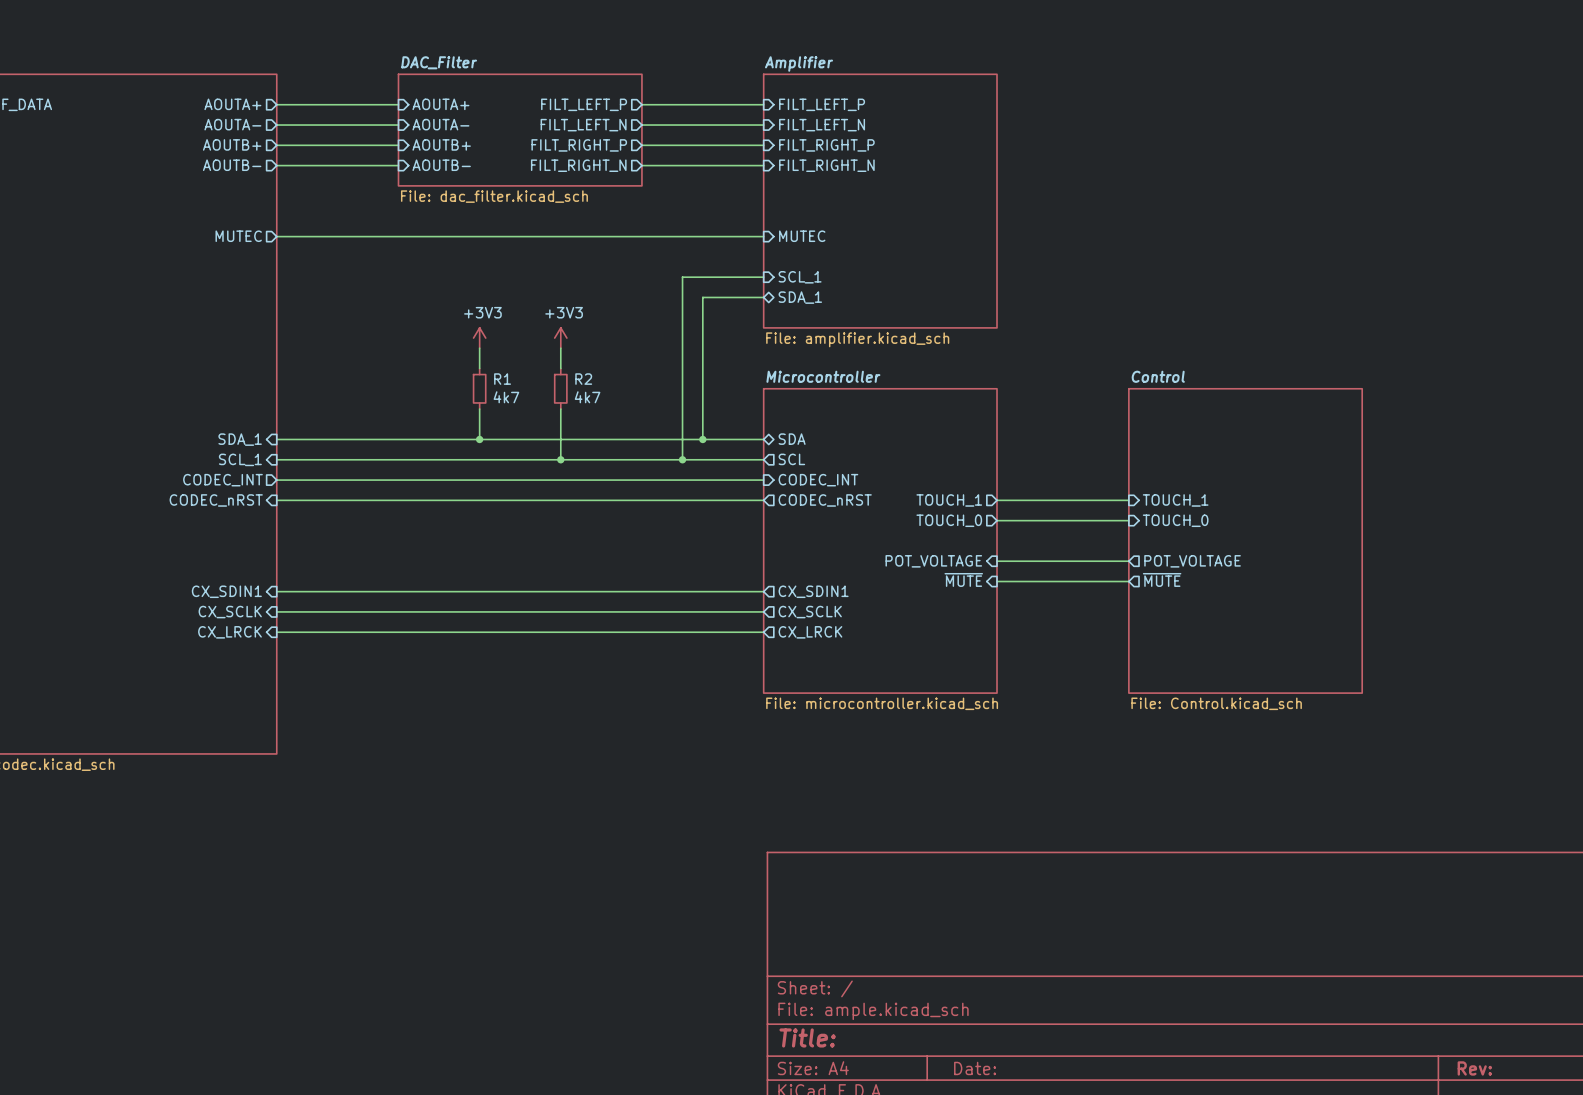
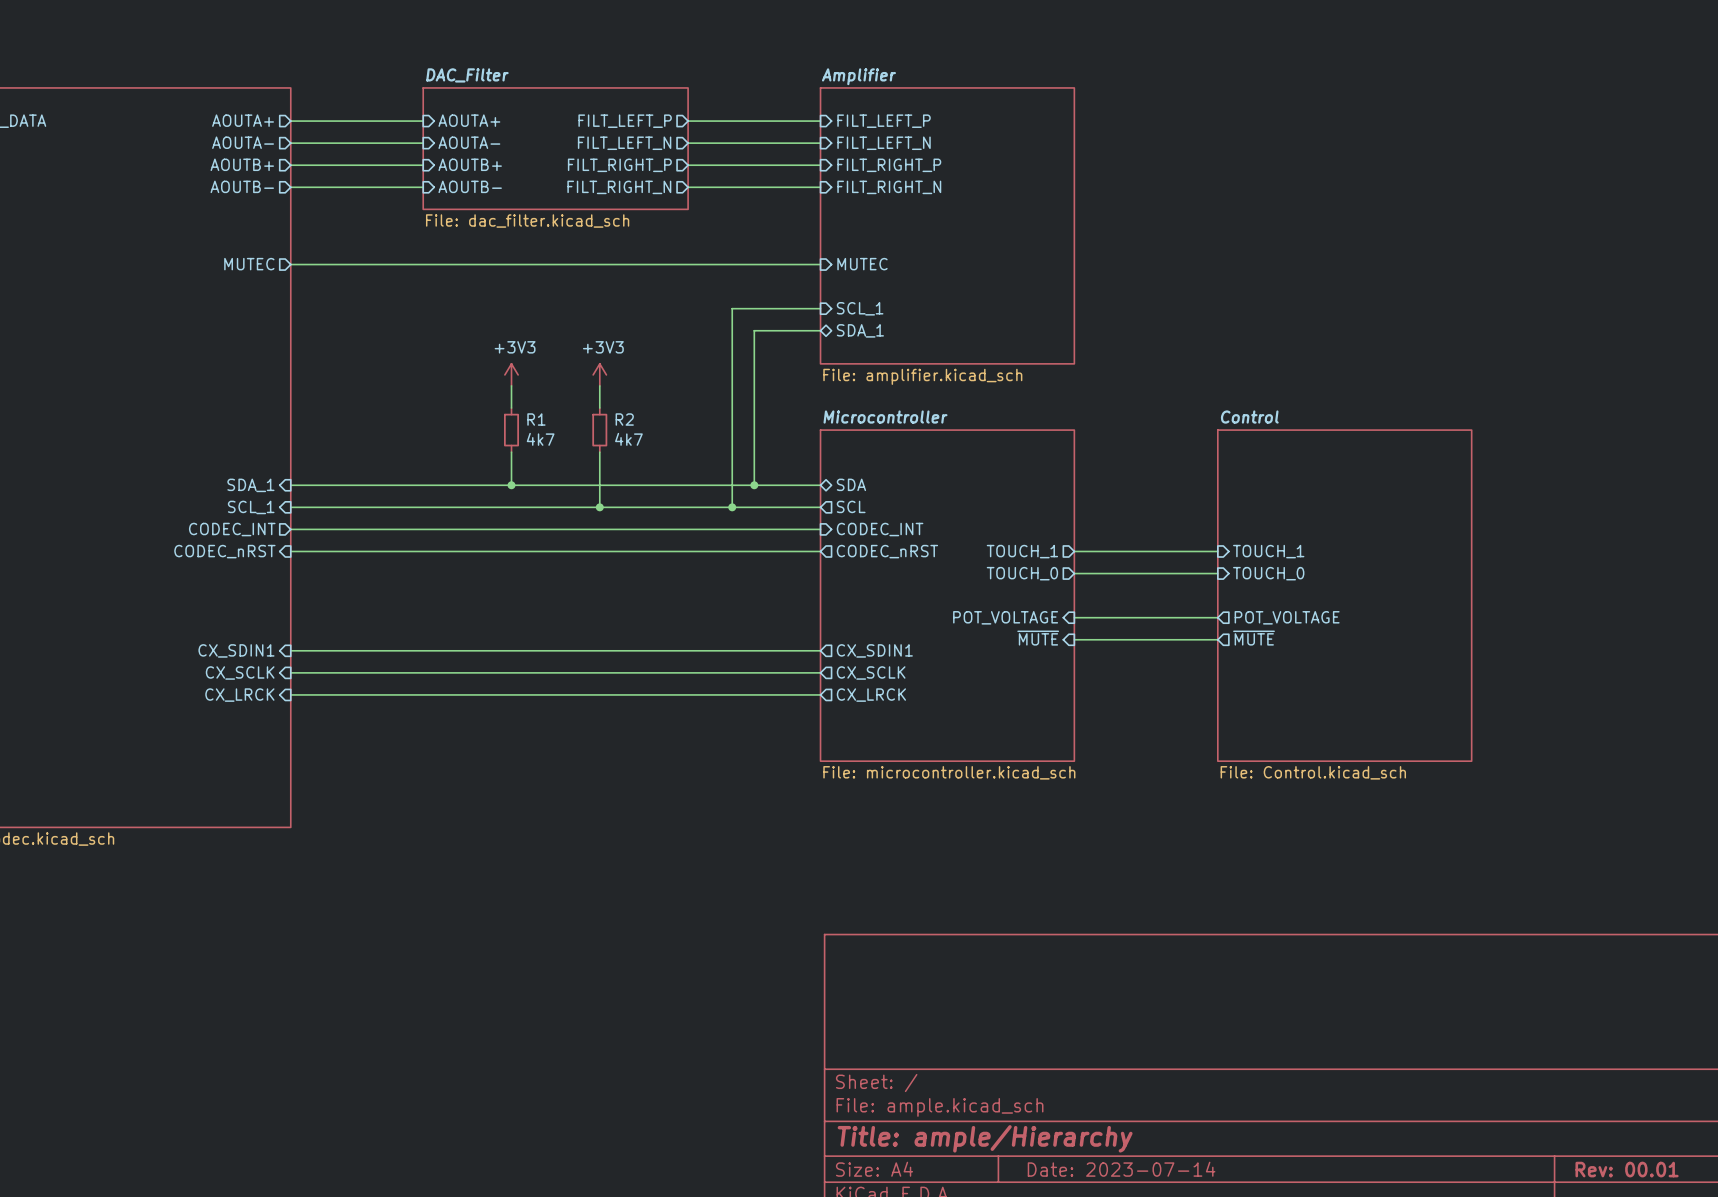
title block: Title: (807, 1037) -> Title: ample/Hierarchy (985, 1138)
title block: Date: (975, 1068) -> Date: 2023-07-14 (1121, 1169)
title block: Rev: (1474, 1068) -> Rev: 00.01 (1627, 1169)

